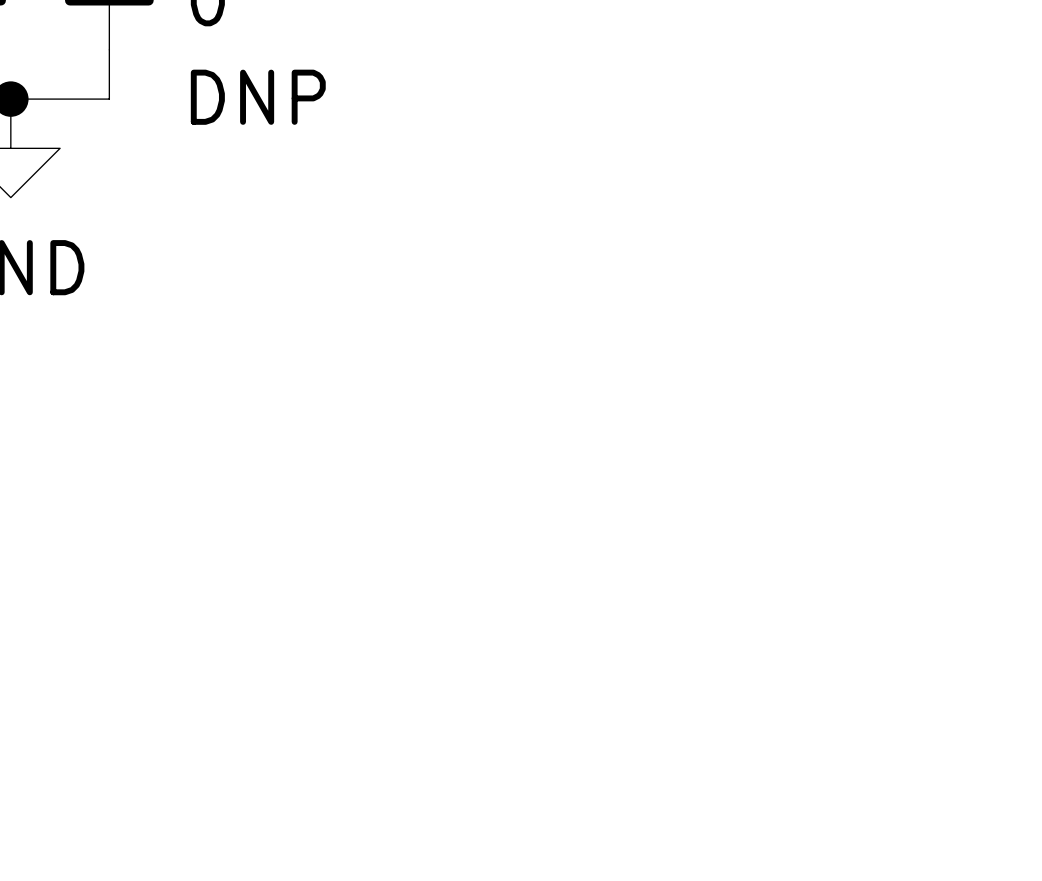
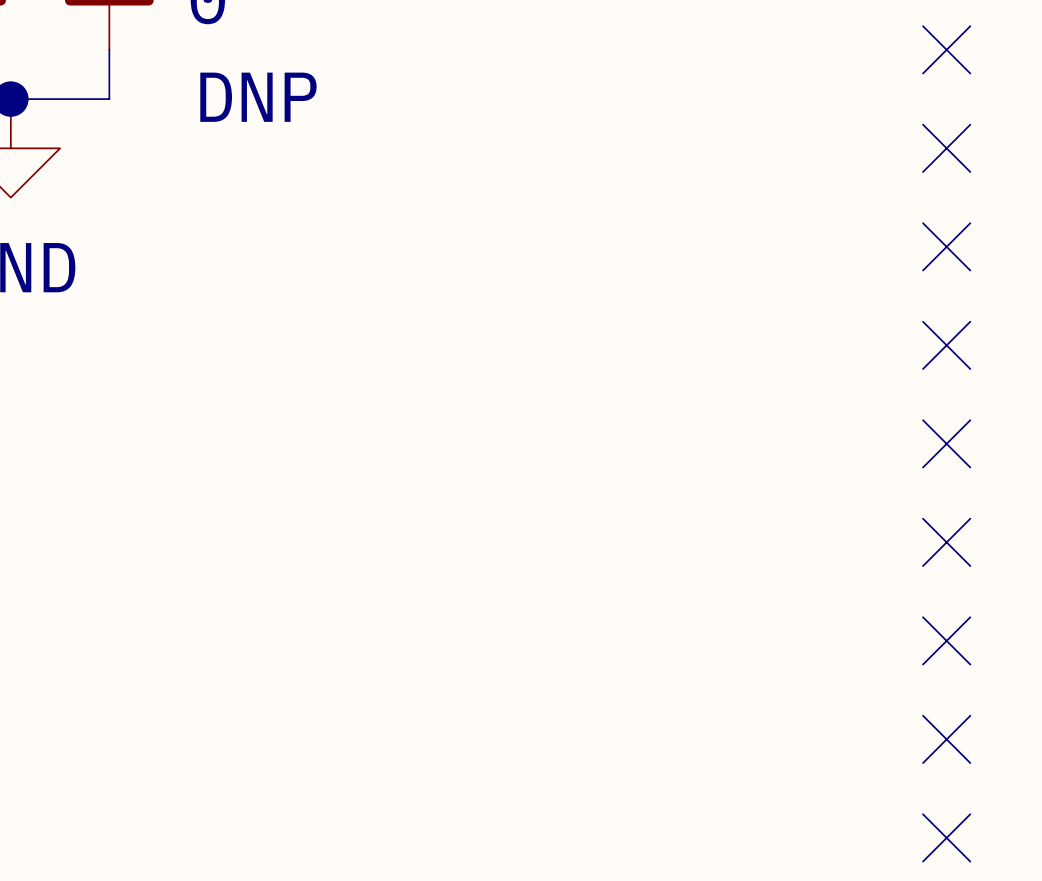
no-connect mark: none -> (946, 49)
no-connect mark: none -> (946, 148)
no-connect mark: none -> (946, 246)
no-connect mark: none -> (946, 345)
no-connect mark: none -> (946, 443)
no-connect mark: none -> (946, 542)
no-connect mark: none -> (946, 640)
no-connect mark: none -> (946, 739)
no-connect mark: none -> (946, 837)

